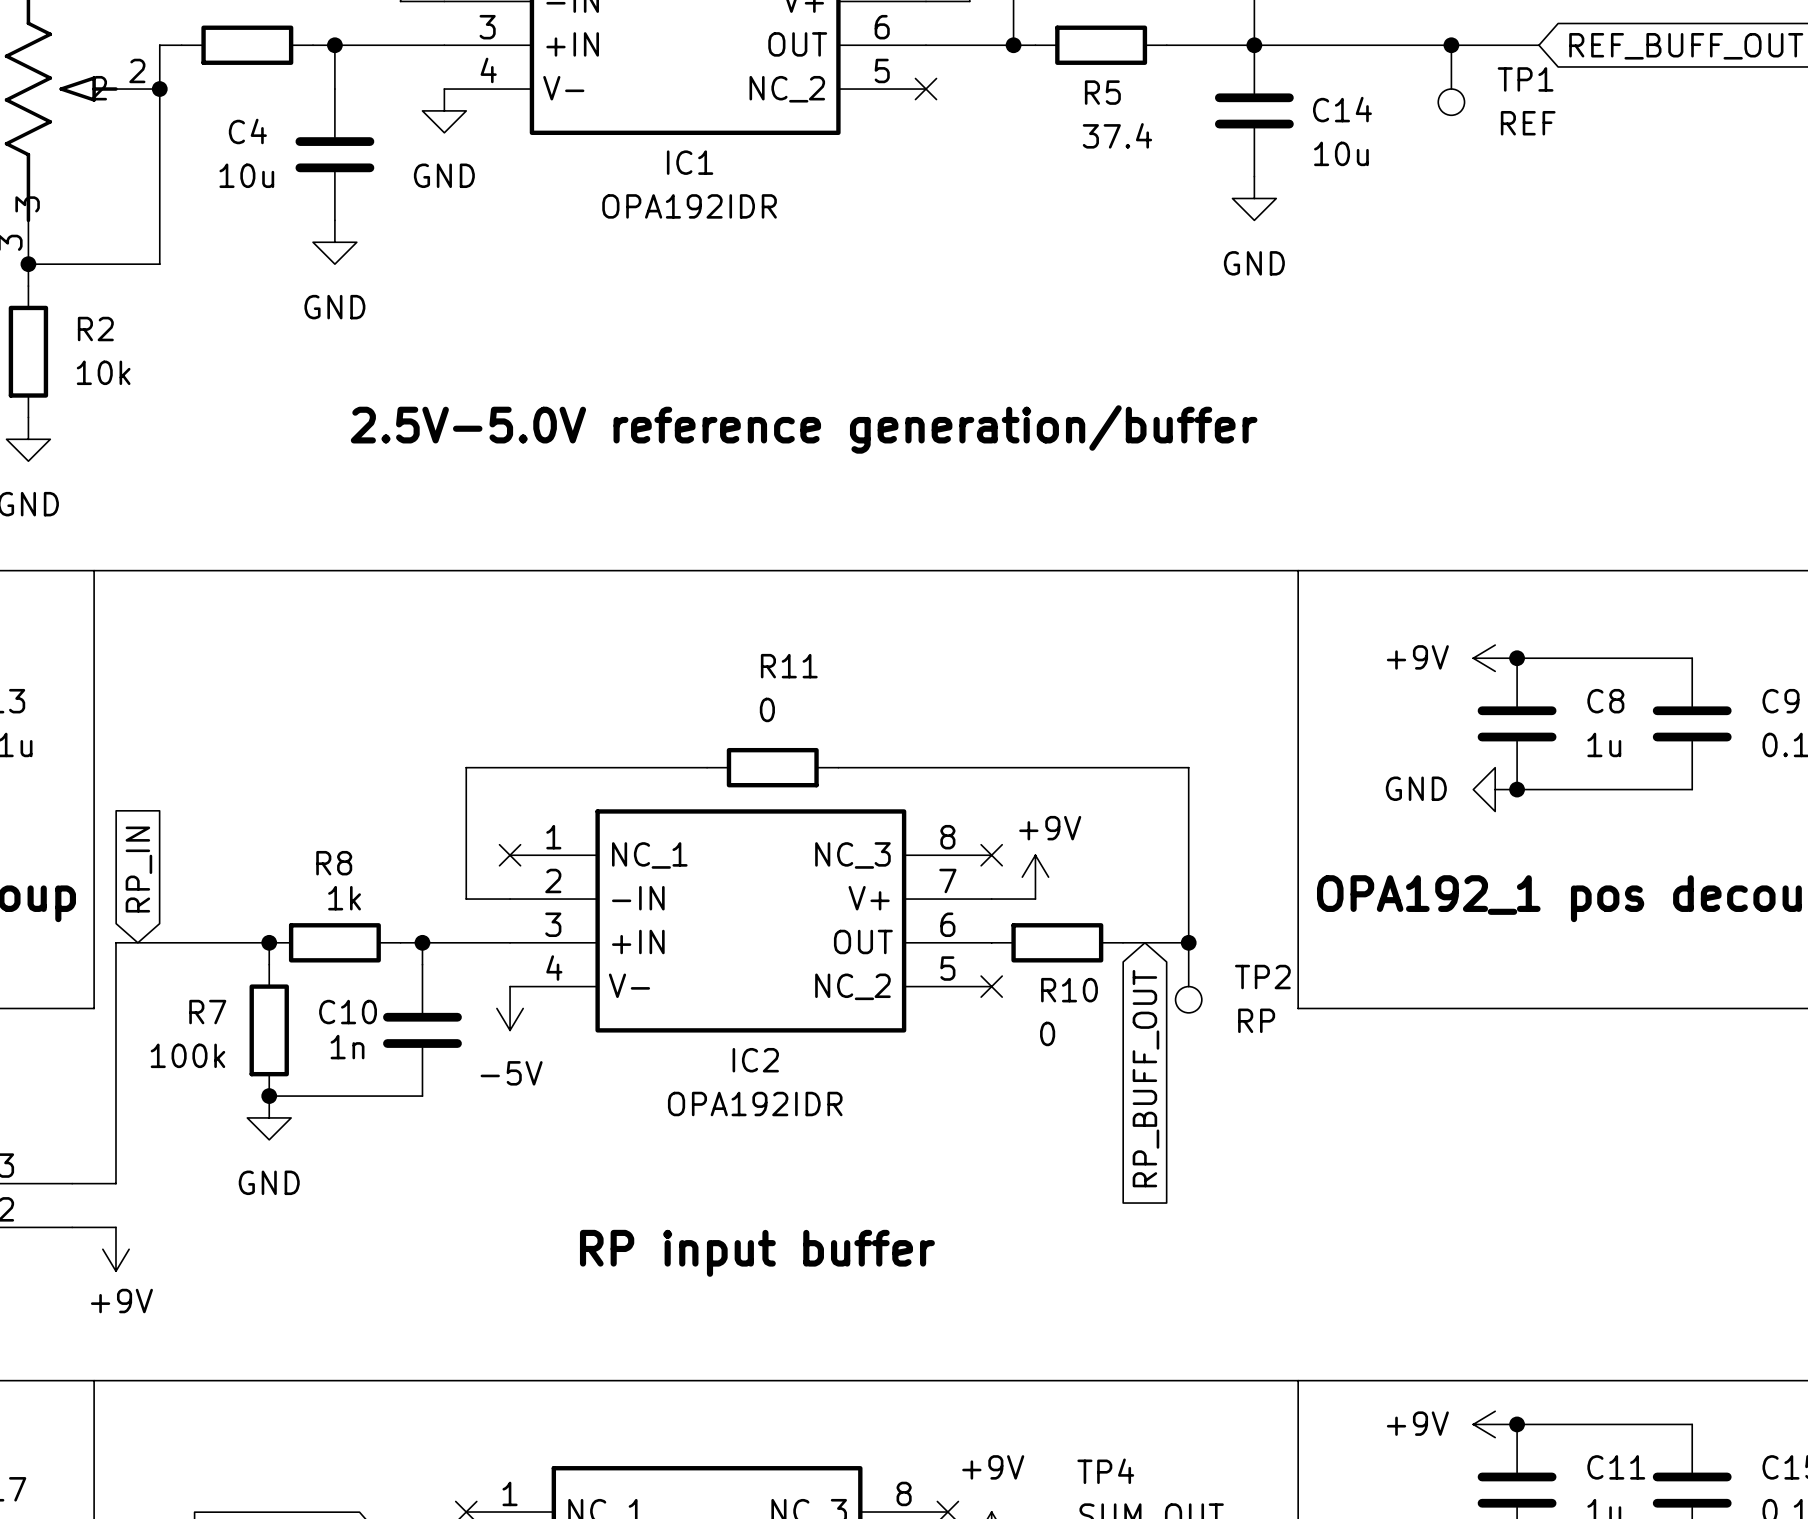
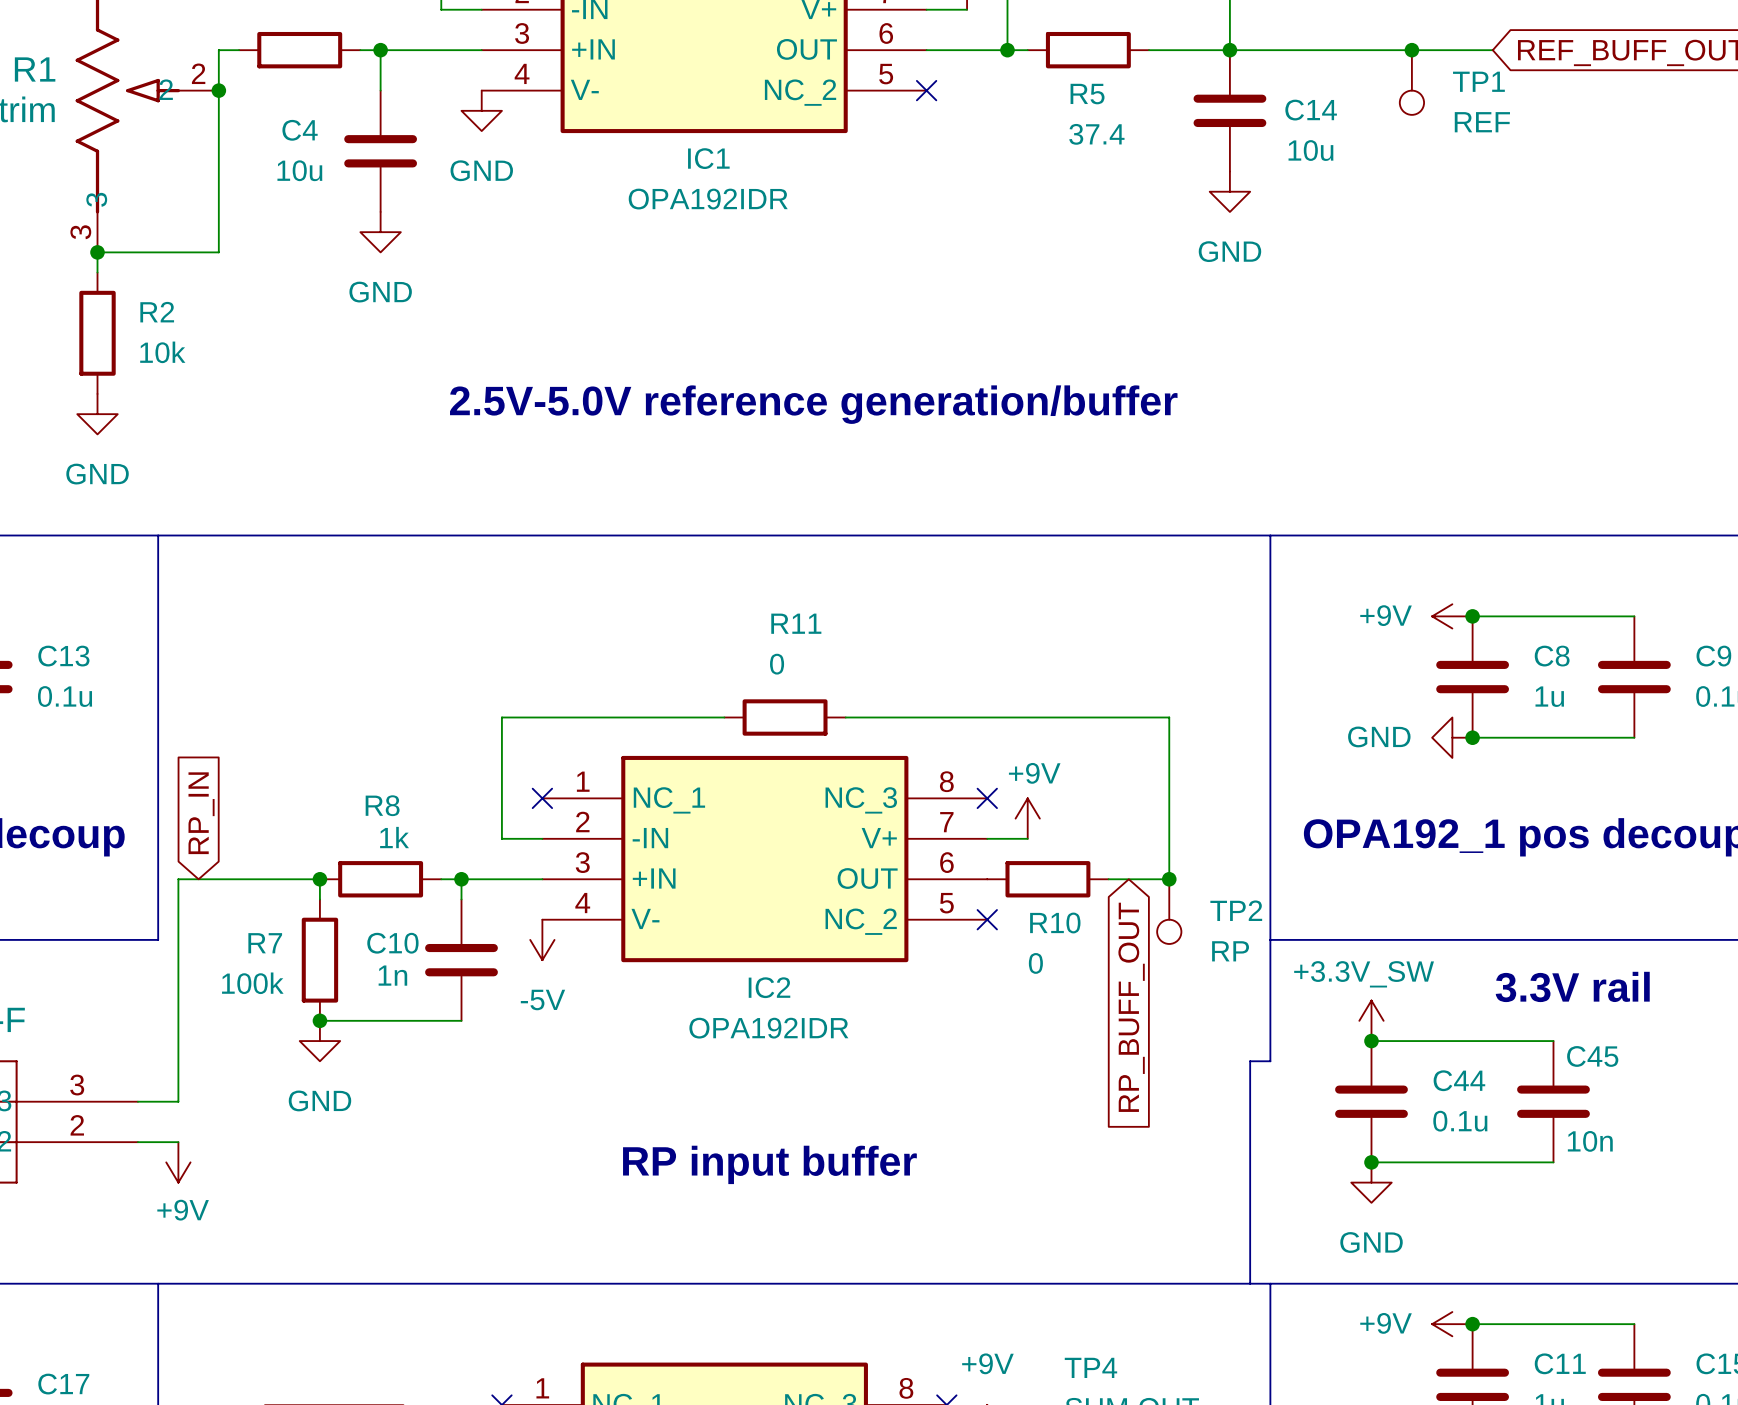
line: none -> (1270, 939) (1270, 1061) (1250, 1061) (1250, 1283)
text: none -> 3.3V rail (1572, 986)
power symbol: none -> +3.3V_SW (1371, 1020)
wire: none -> (1371, 1041) (1553, 1041)
junction: none -> (1371, 1041)
C44: none -> 0.1u (1371, 1101)
C45: none -> 10n (1553, 1101)
wire: none -> (1371, 1162) (1553, 1162)
junction: none -> (1371, 1162)
power symbol: none -> GND (1371, 1182)

